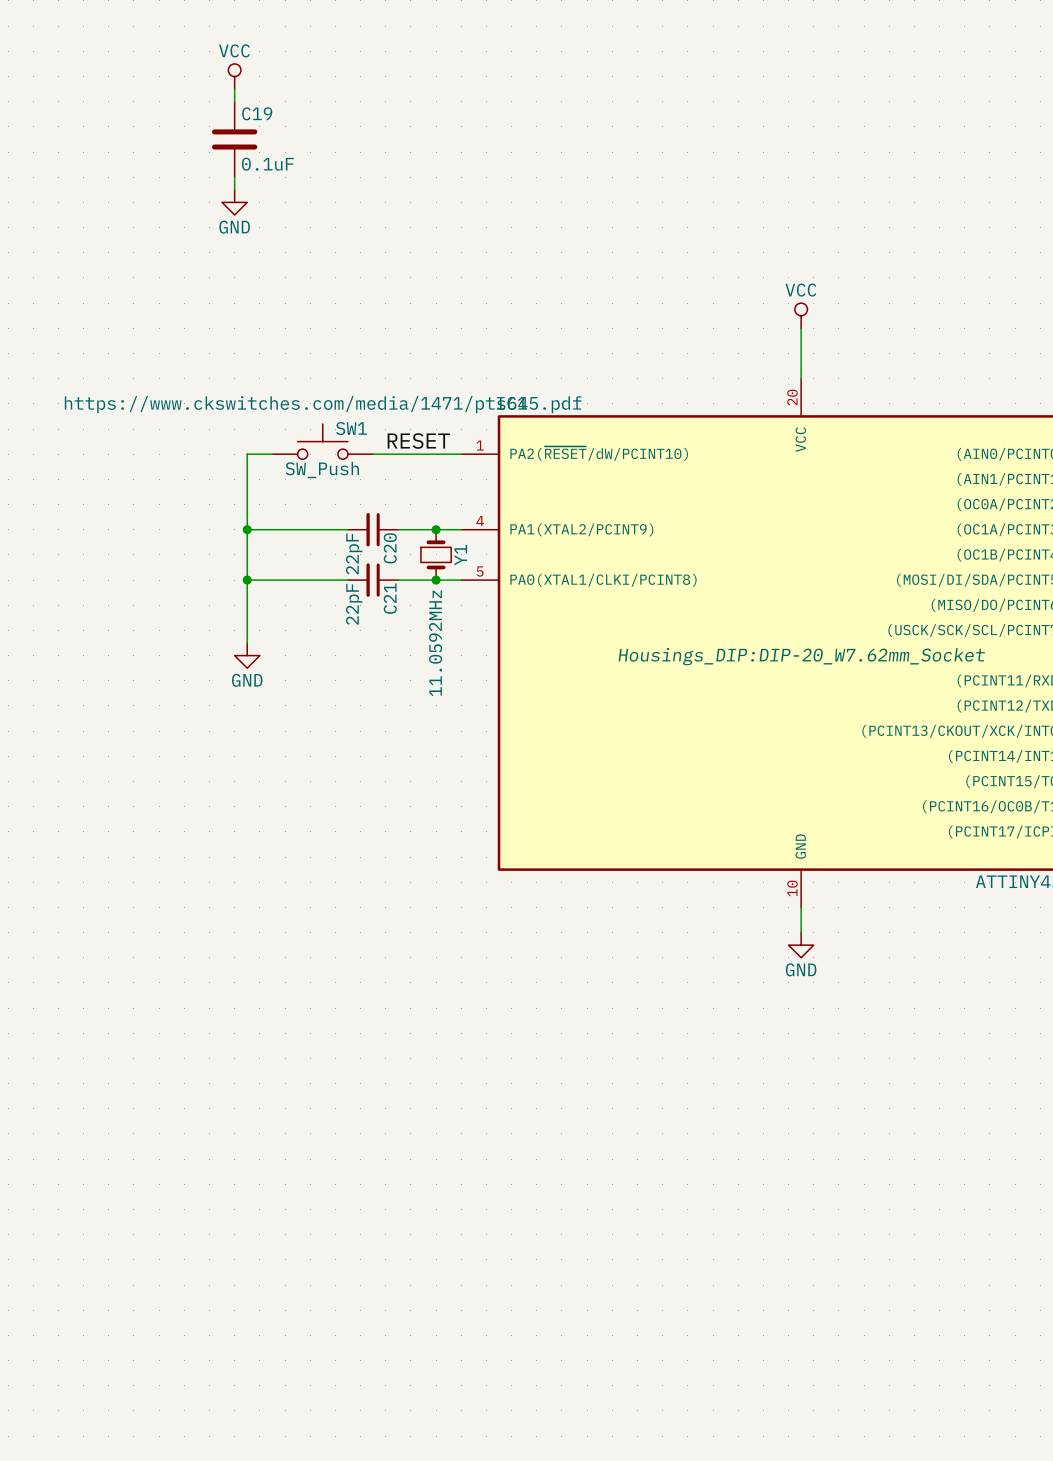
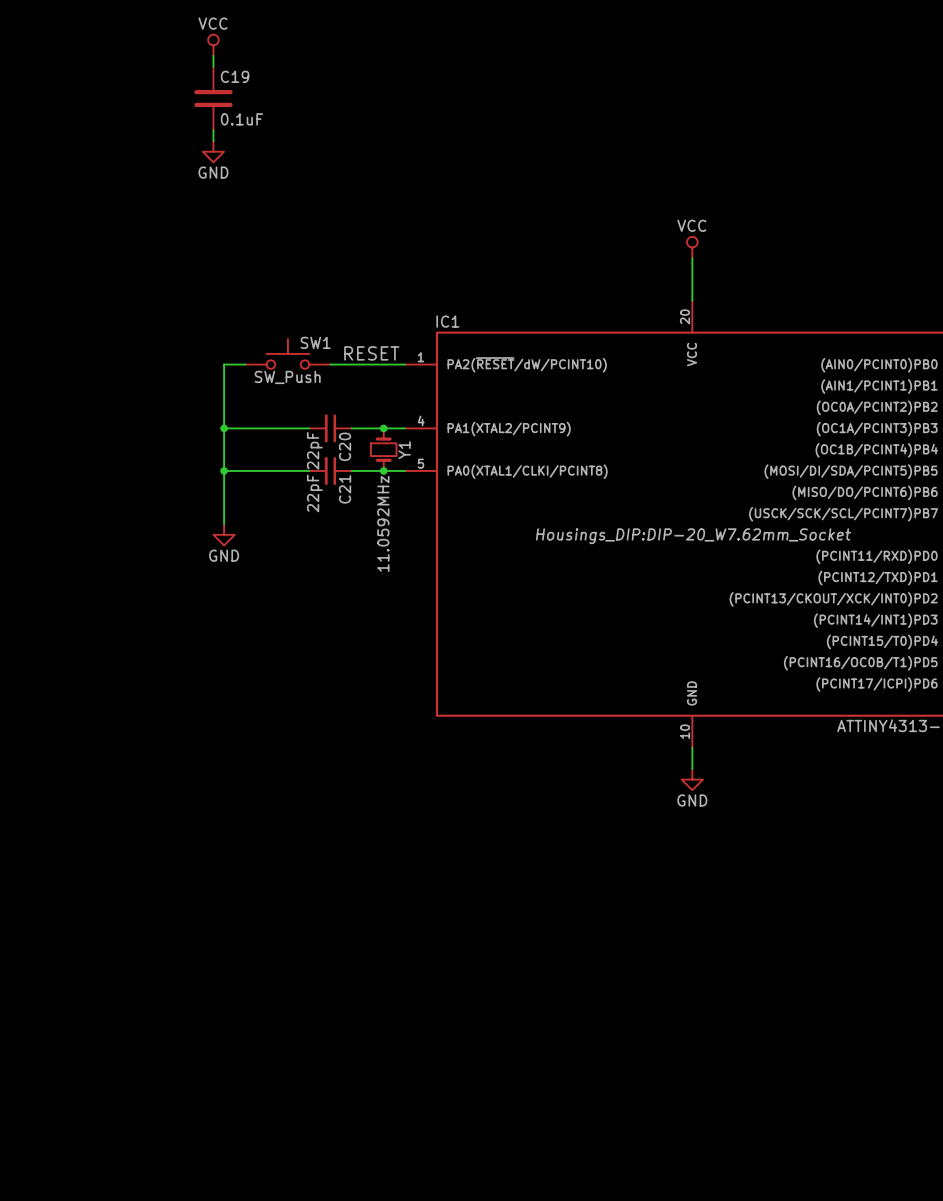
SW1 text: https://www.ckswitches.com/media/1471/pts645.pdf (323, 404) -> none

